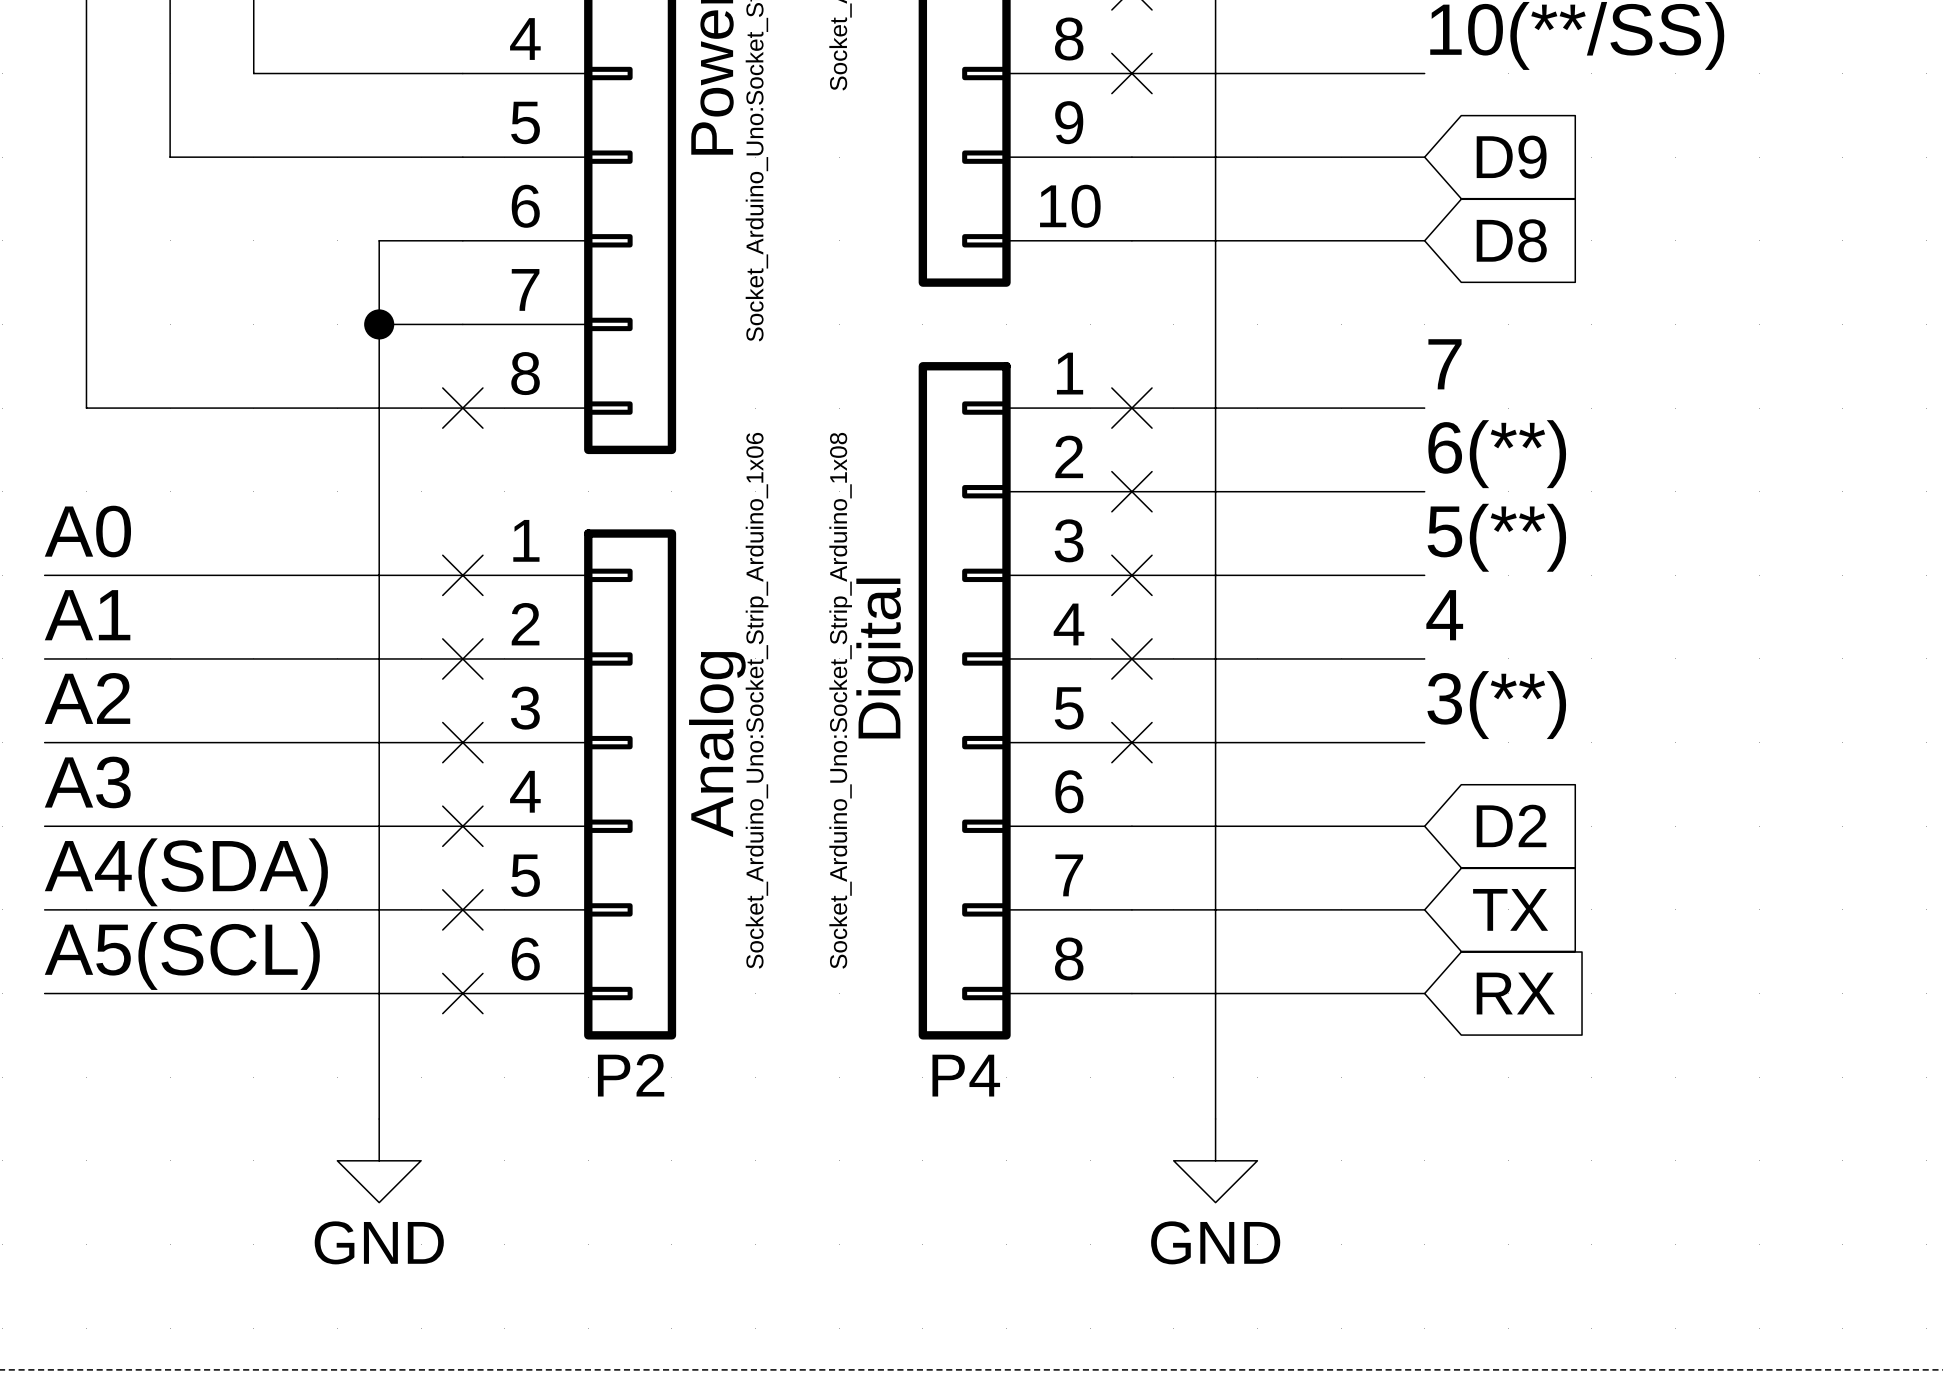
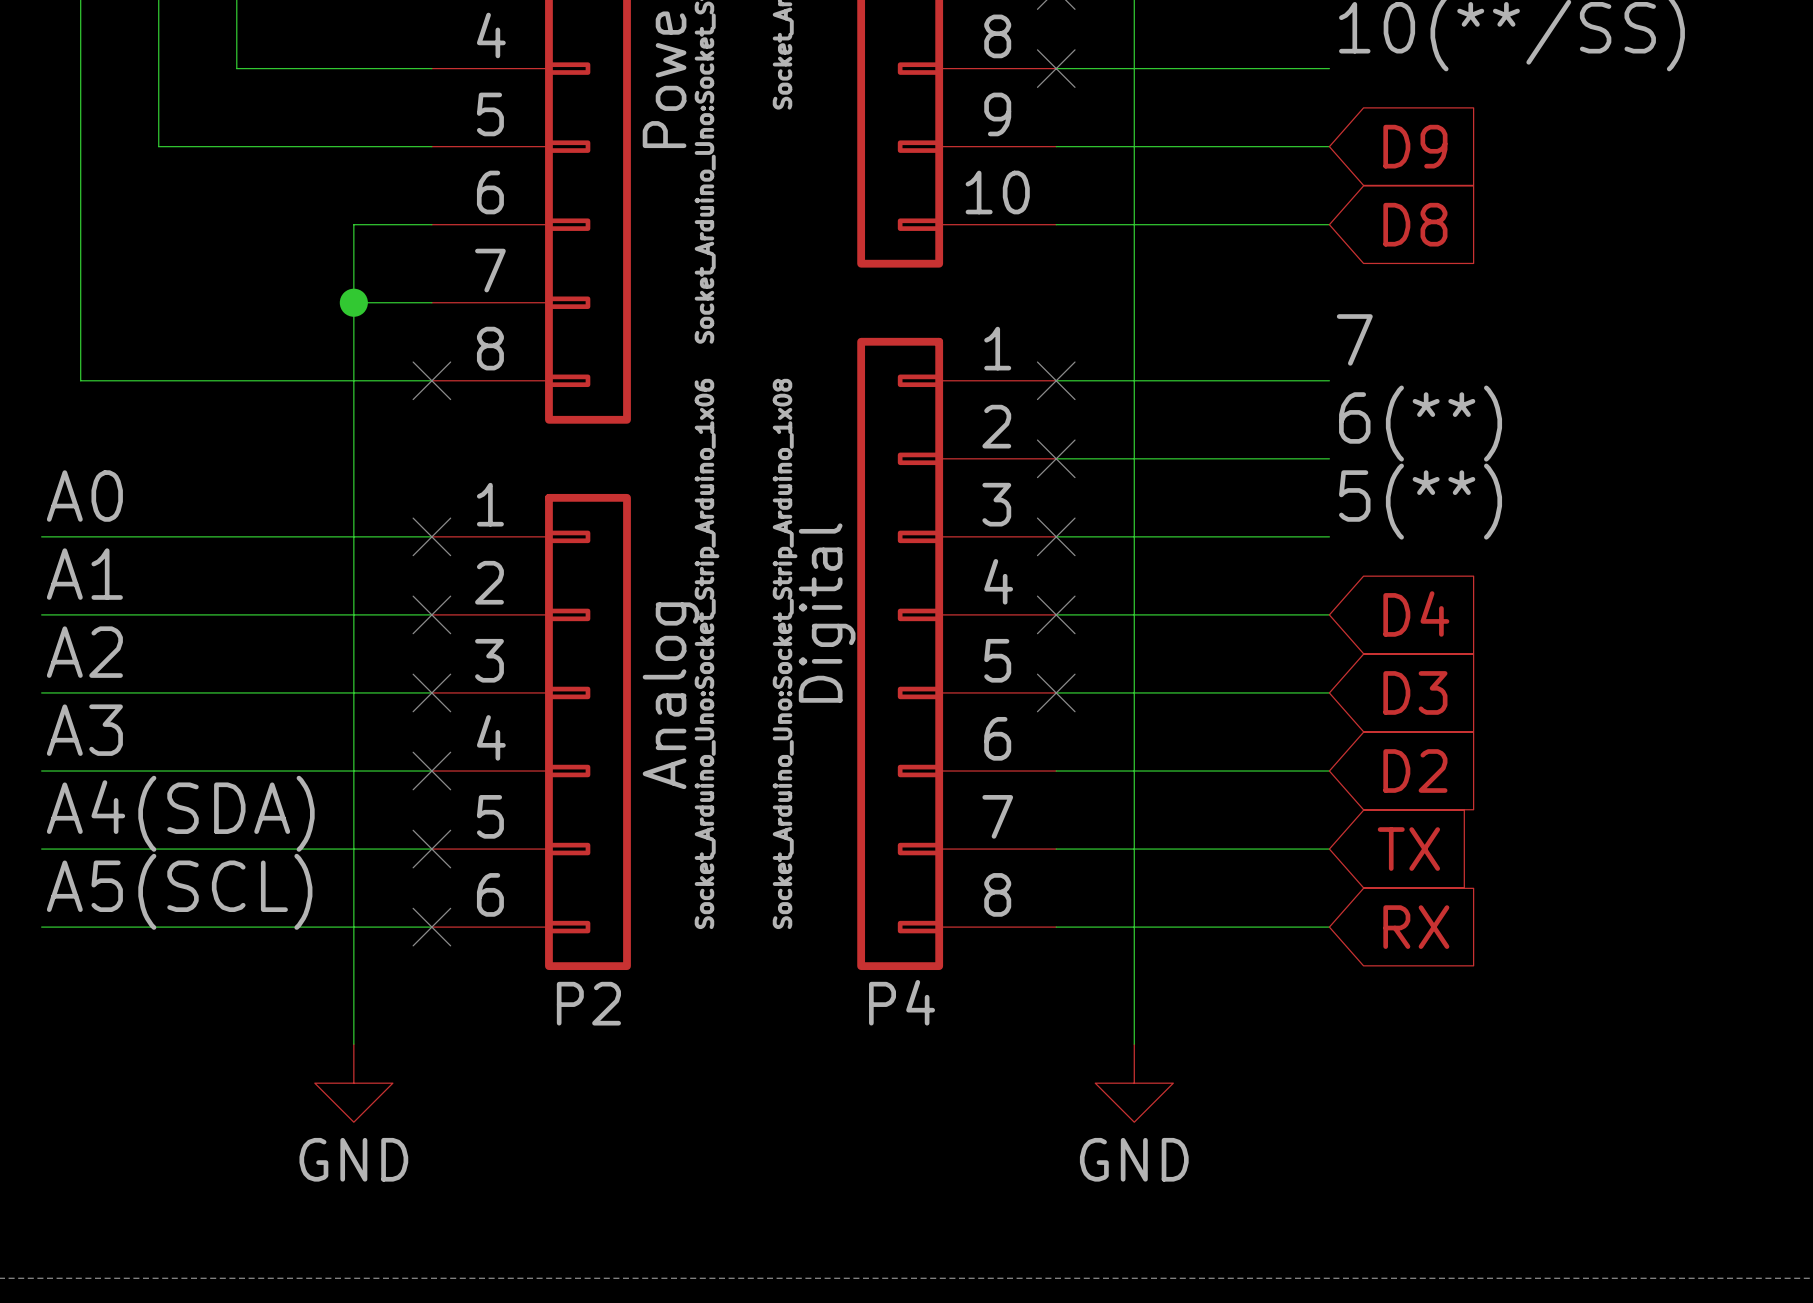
label: 4 (1444, 615) -> none
global label: none -> D4 (1416, 613)
label: 3(**) (1496, 705) -> none
global label: none -> D3 (1415, 692)

